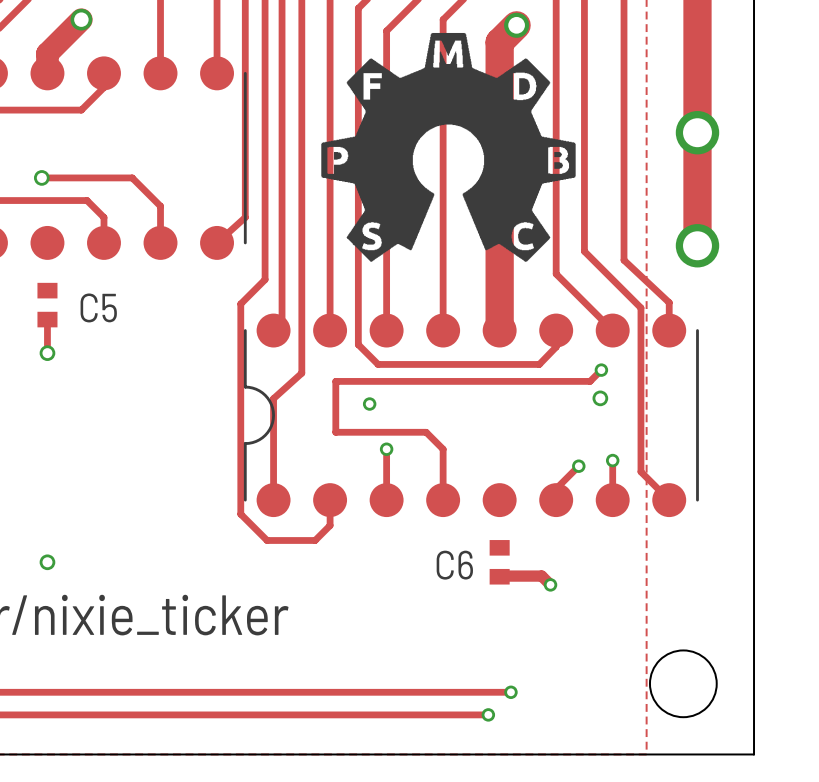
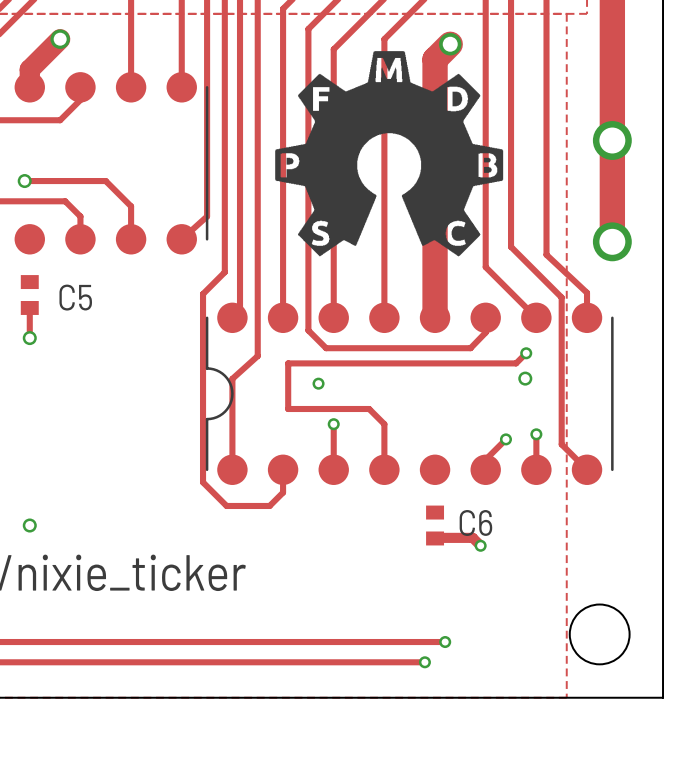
C6 name position: C6 (454, 565) -> C6 (475, 523)

